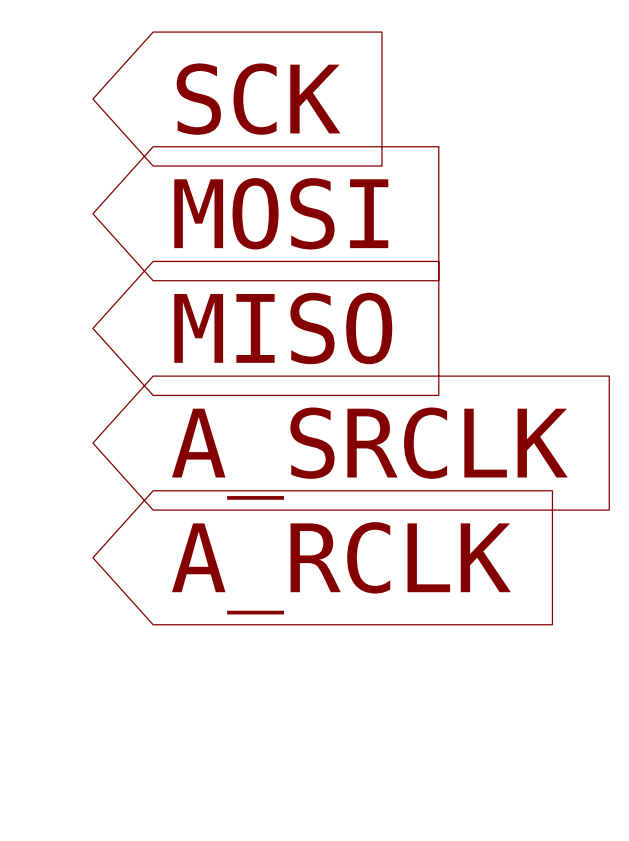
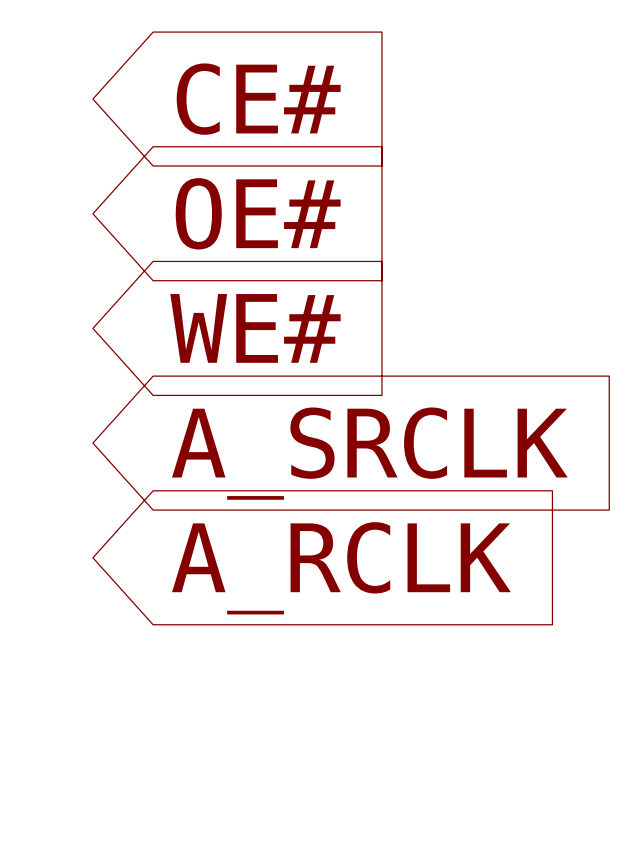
global label: SCK (258, 99) -> CE# (258, 99)
global label: MOSI (281, 213) -> OE# (258, 213)
global label: MISO (283, 328) -> WE# (255, 328)

